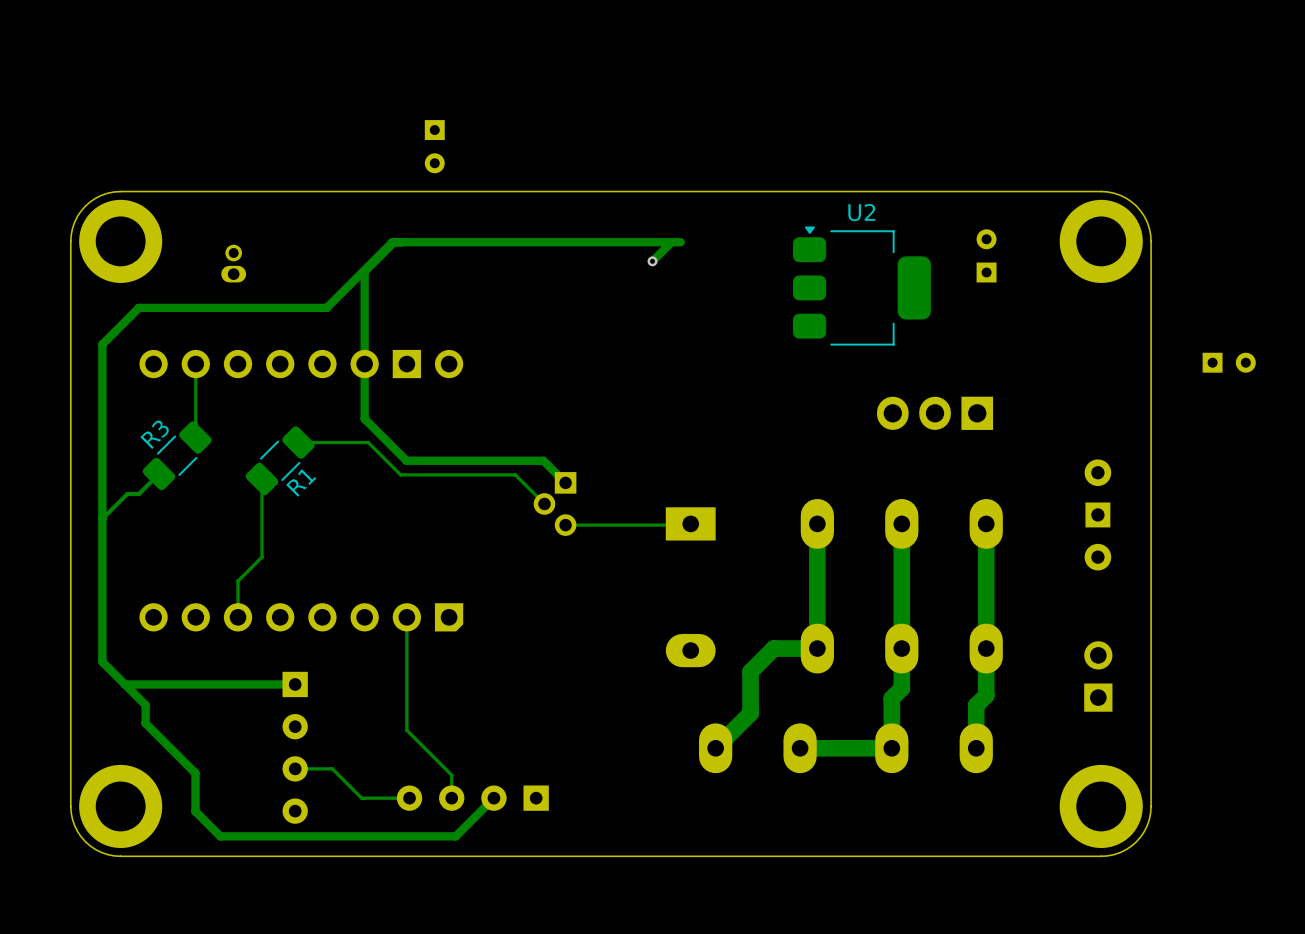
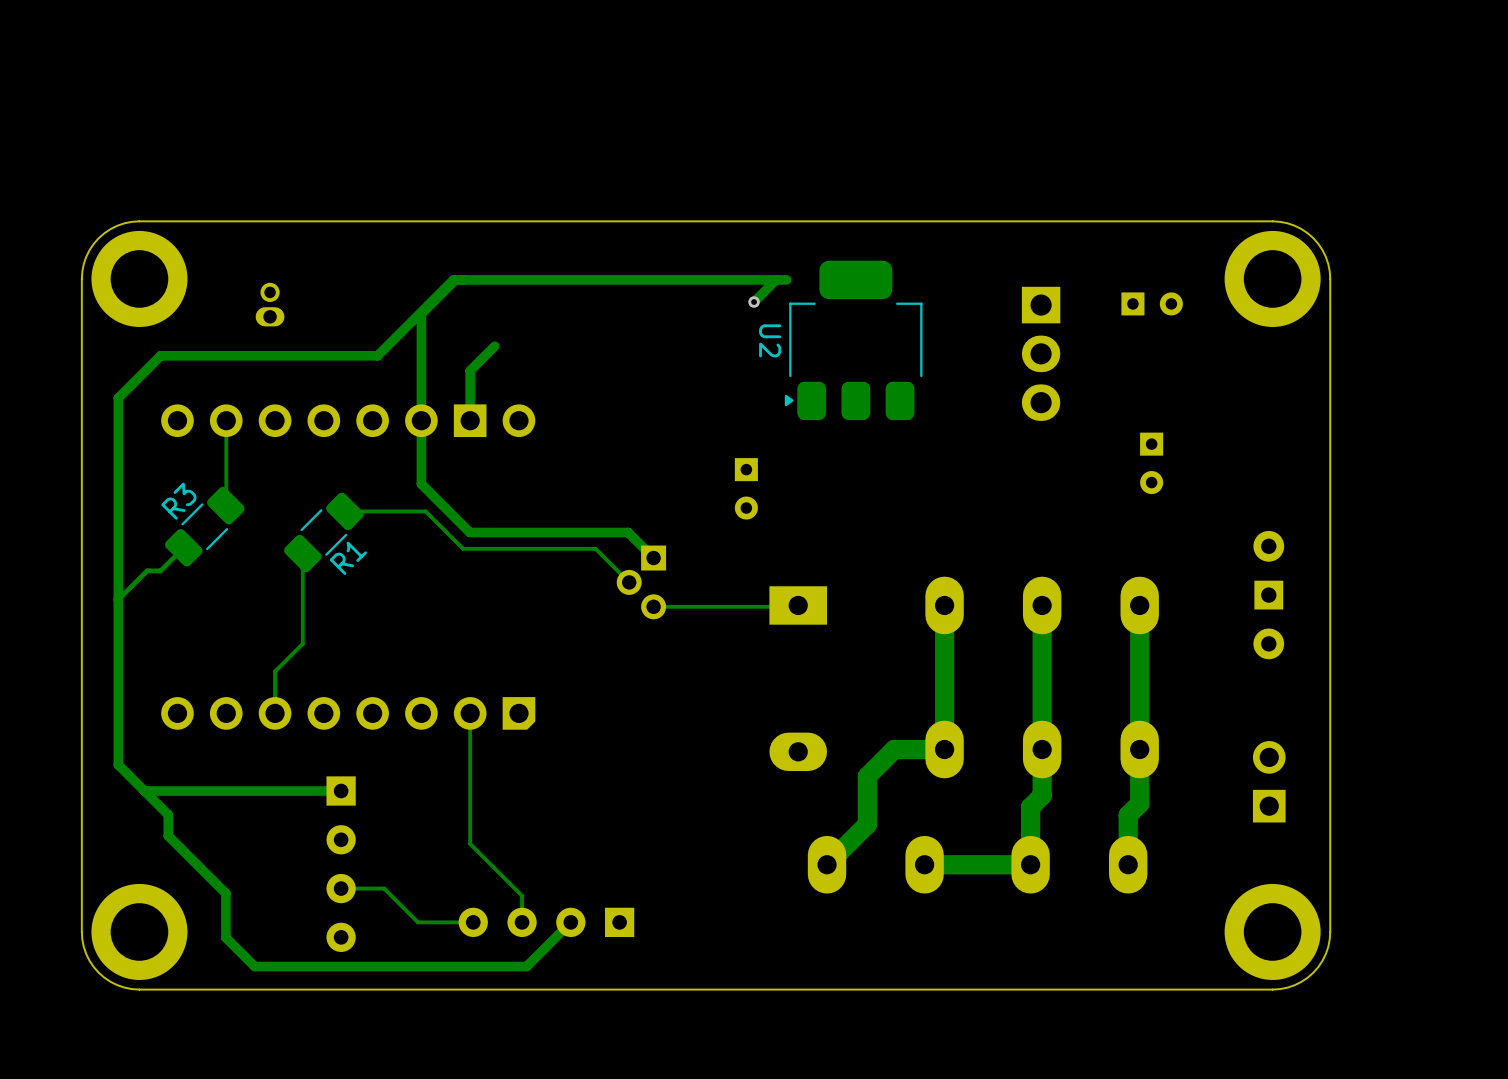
part: (434, 146) -> none
part rotation: 0° (986, 255) -> 90° clockwise (1152, 303)
U2 rotation: 0° (861, 286) -> 90° counterclockwise (853, 340)
U2 position: (861, 286) -> (853, 340)
track: none -> (494, 346) (470, 370) (470, 420)
part rotation: 0° (1229, 362) -> 90° clockwise (1151, 463)
part position: (1229, 362) -> (1151, 463)
part rotation: 0° (935, 413) -> 90° counterclockwise (1041, 353)
part position: (935, 413) -> (1041, 353)
part: none -> (746, 488)

